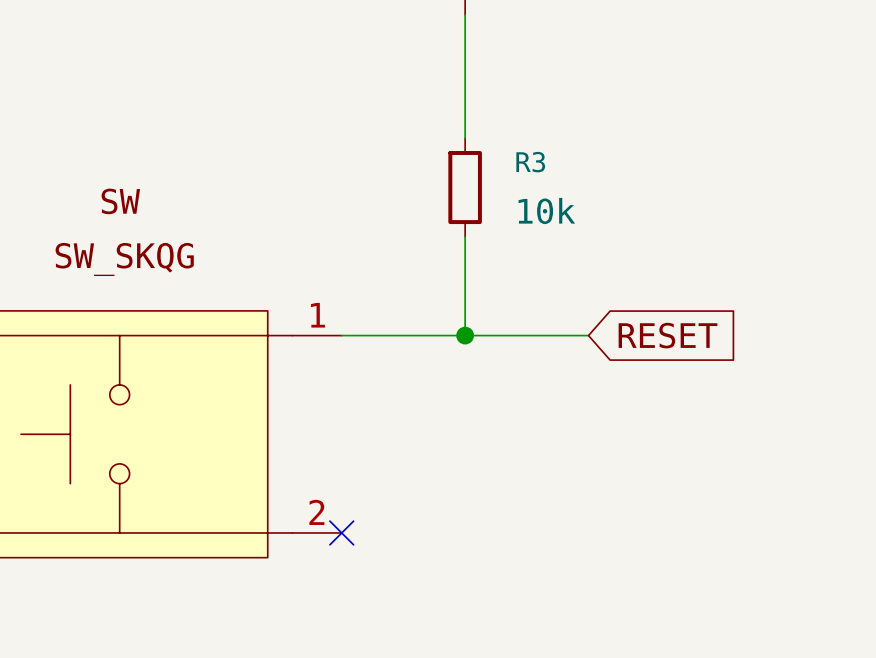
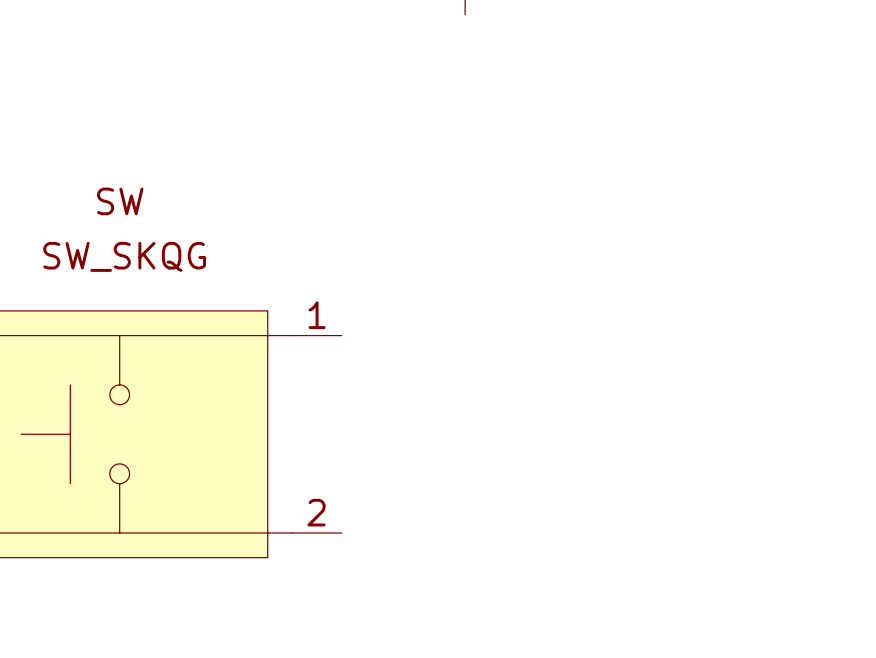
wire: (465, 14) (465, 138) -> none
R3: 10k (465, 187) -> none
wire: (465, 236) (465, 335) -> none
wire: (341, 335) (588, 335) -> none
junction: (465, 335) -> none
global label: RESET (668, 335) -> none
no-connect mark: (341, 532) -> none

